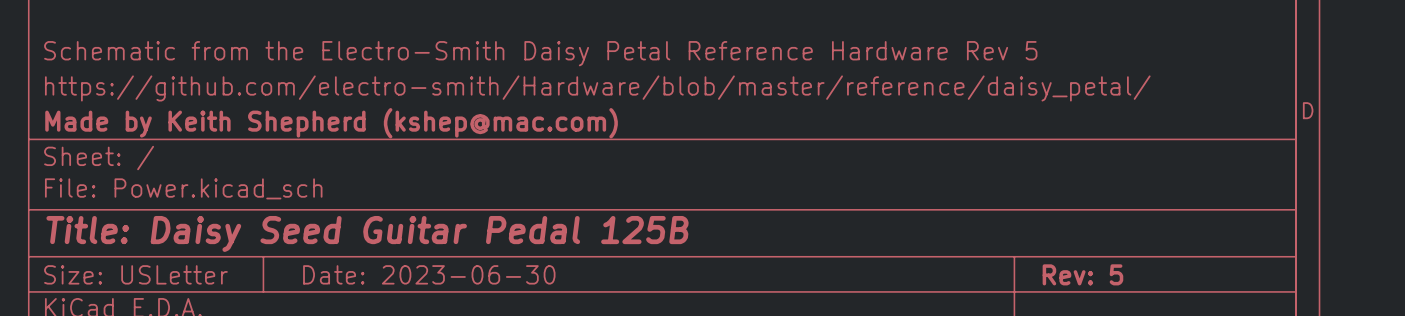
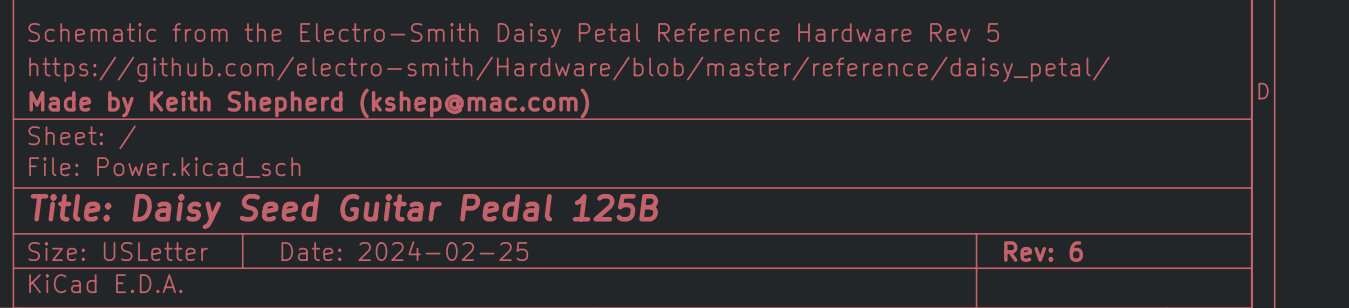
title block: Date: 2023-06-30 (429, 274) -> Date: 2024-02-25 (404, 251)
title block: Rev: 5 (1082, 274) -> Rev: 6 (1043, 251)

